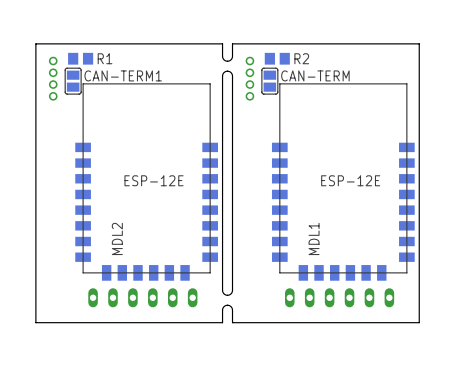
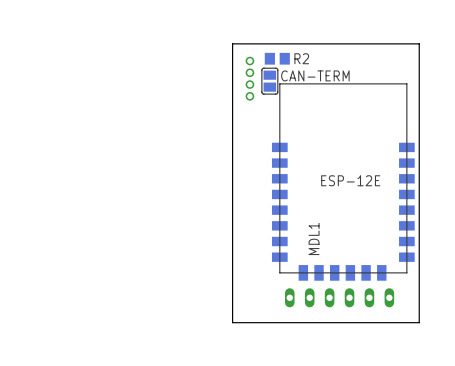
board edge: (222, 43) (35, 43) (35, 322) (222, 322) (222, 308) (227, 305) (232, 308) (232, 322) -> (232, 43) (232, 322)
board edge: (232, 43) (232, 57) (227, 61) (222, 57) (222, 43) -> none
R1: (80, 58) -> none
board edge: (227, 71) (222, 76) (222, 290) (227, 295) (232, 290) (232, 76) (227, 71) -> none
part: (53, 78) -> none
CAN-TERM1: (73, 81) -> none
MDL2: (146, 182) -> none
part: (142, 297) -> none

